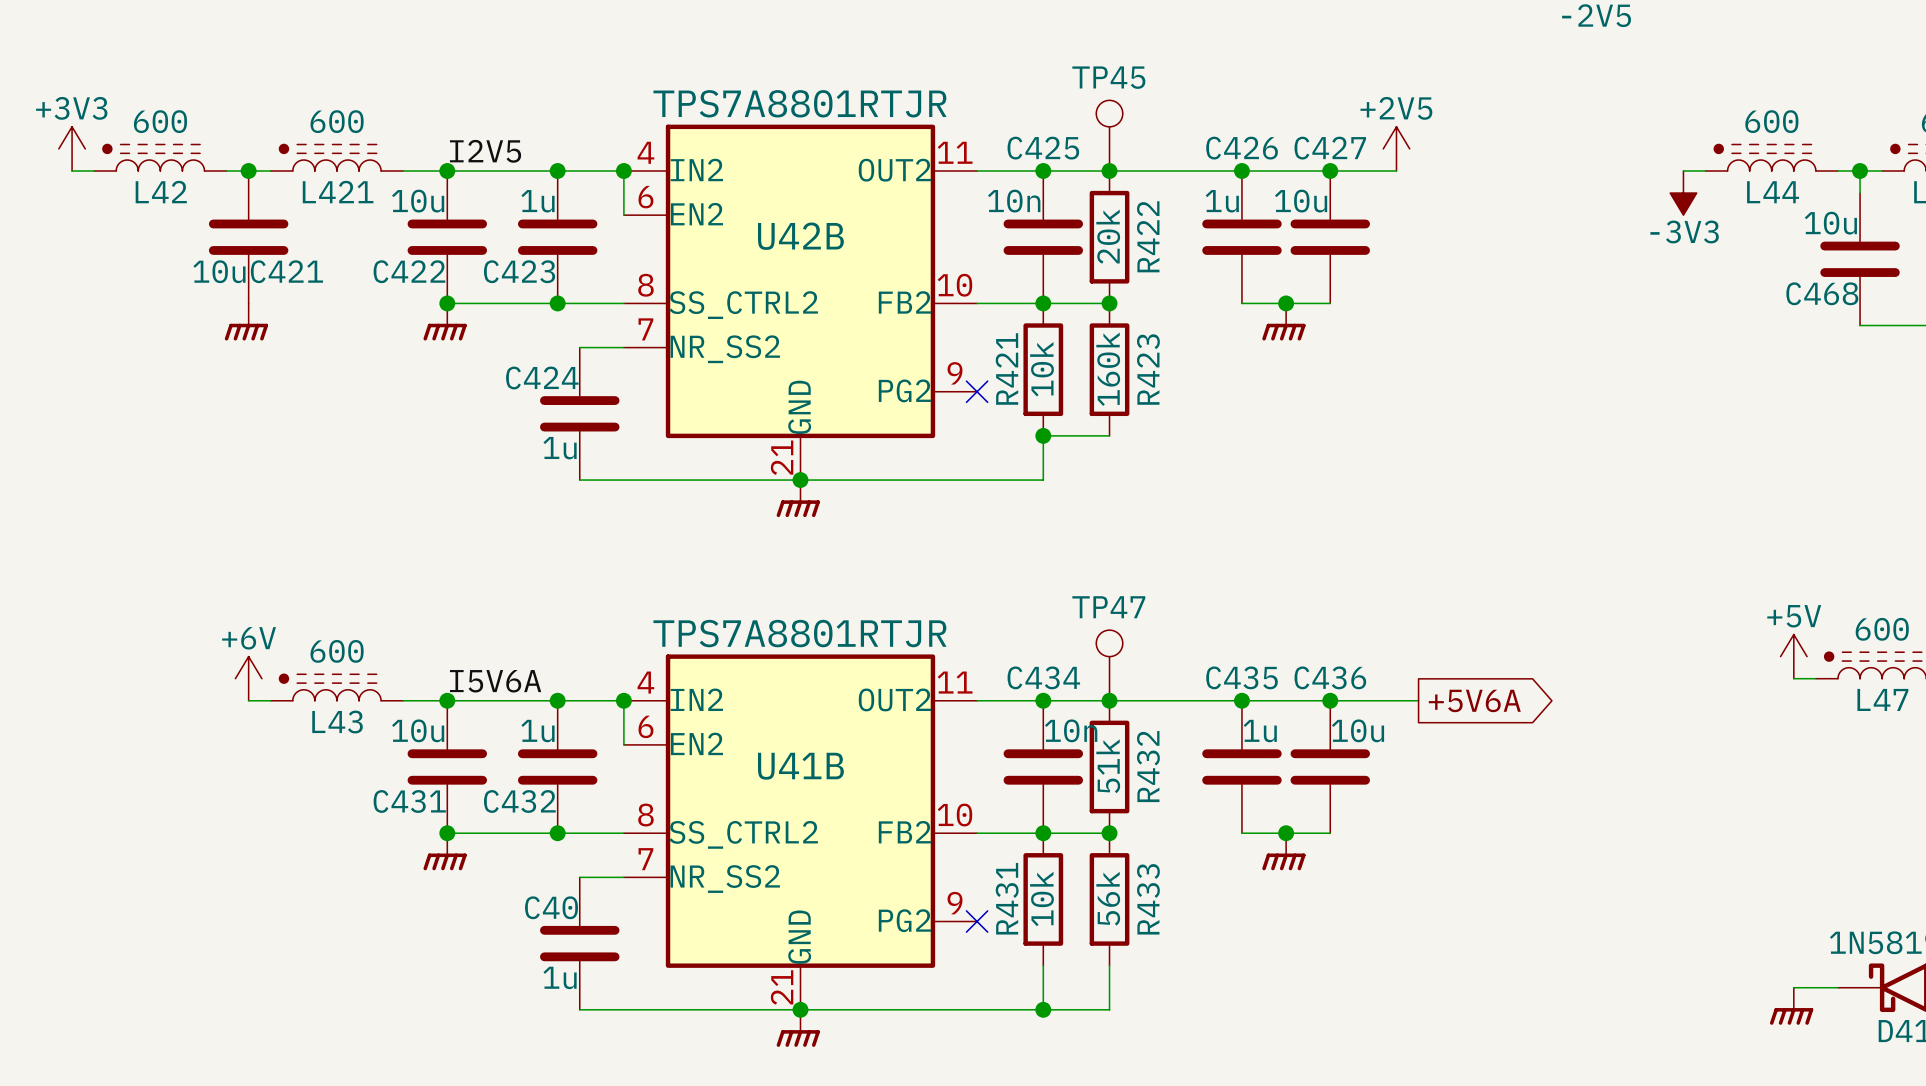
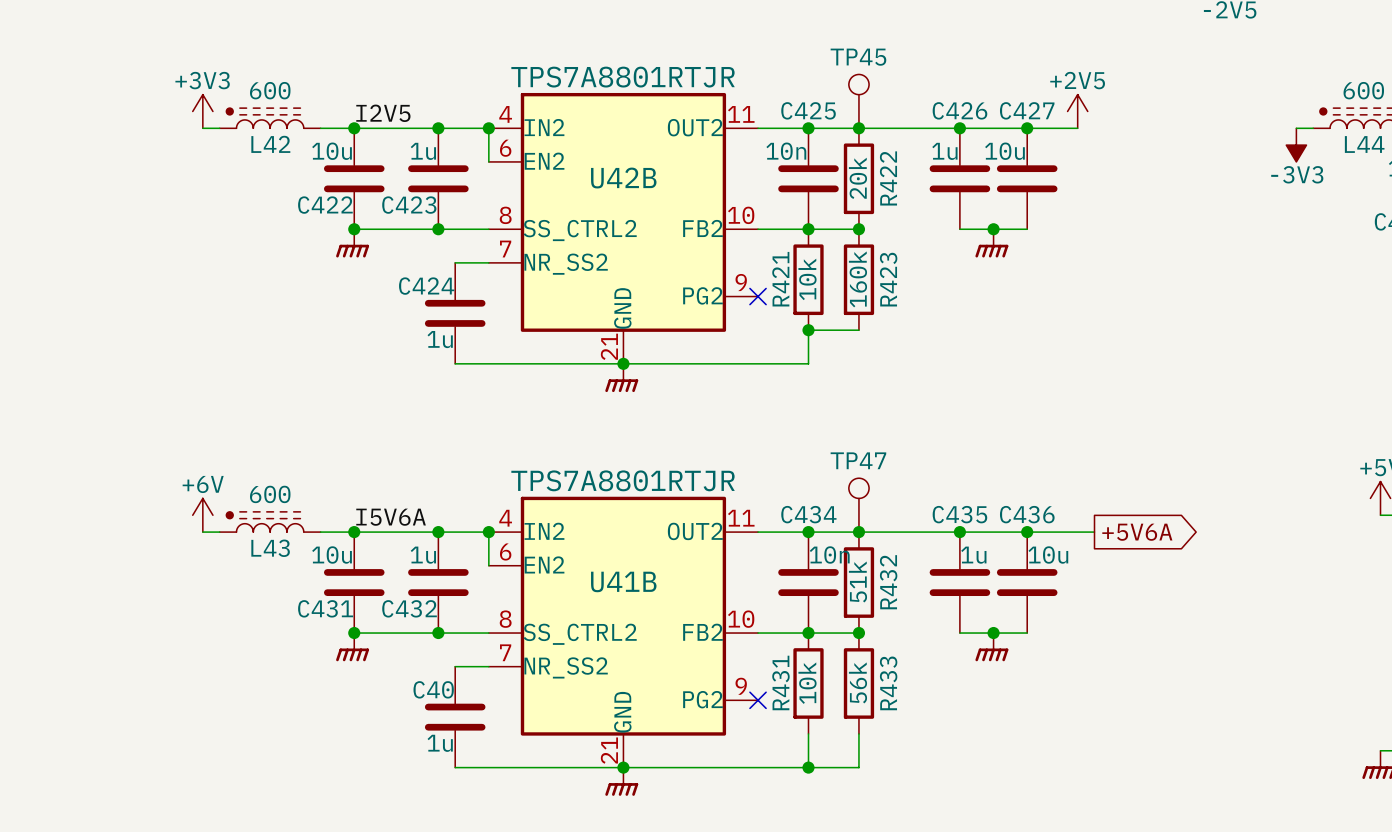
power symbol position: +3V3 (72, 148) -> +3V3 (202, 111)
L42: 600 (160, 157) -> none
wire: (72, 171) (94, 171) -> none
wire: (226, 171) (248, 171) -> none
junction: (248, 171) -> none
L421 name: L421 (338, 192) -> L42 (270, 144)
C421: 10u (248, 237) -> none
power symbol: (246, 321) -> none

